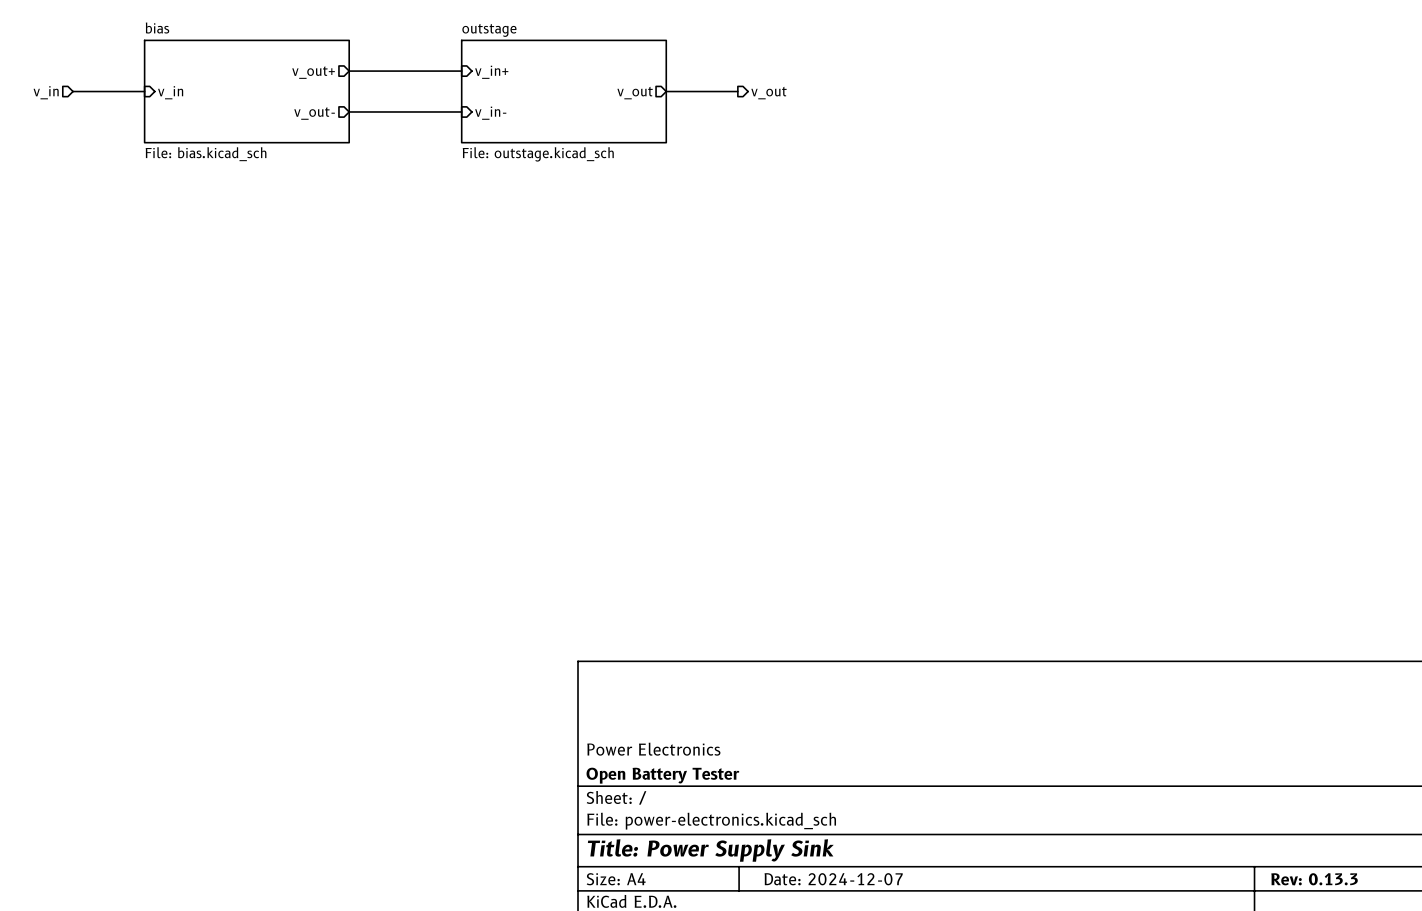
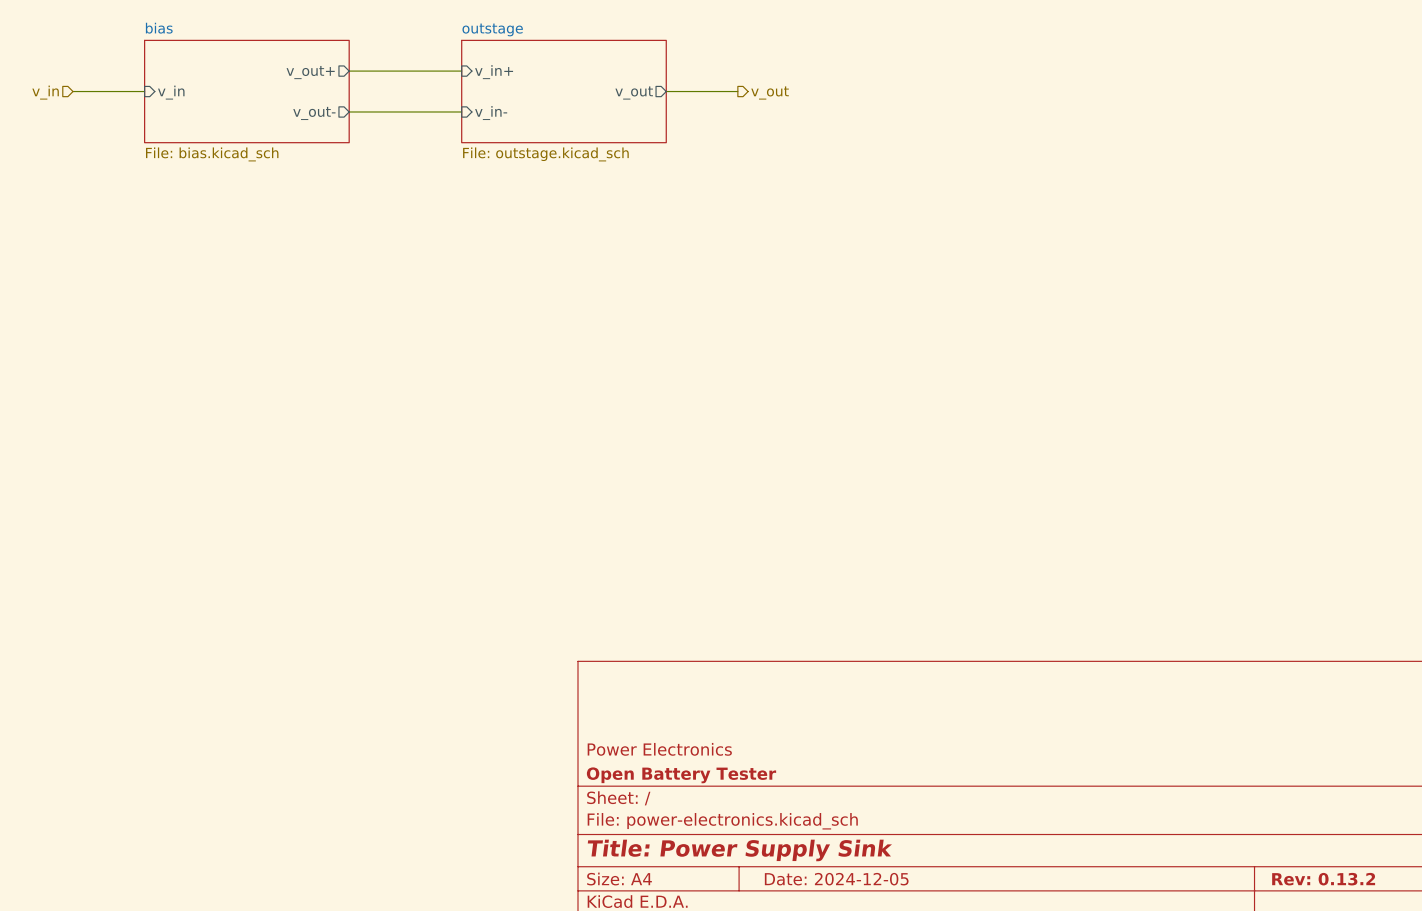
title block: Date: 2024-12-07 (833, 879) -> Date: 2024-12-05 (836, 879)
title block: Rev: 0.13.3 (1314, 879) -> Rev: 0.13.2 (1323, 879)

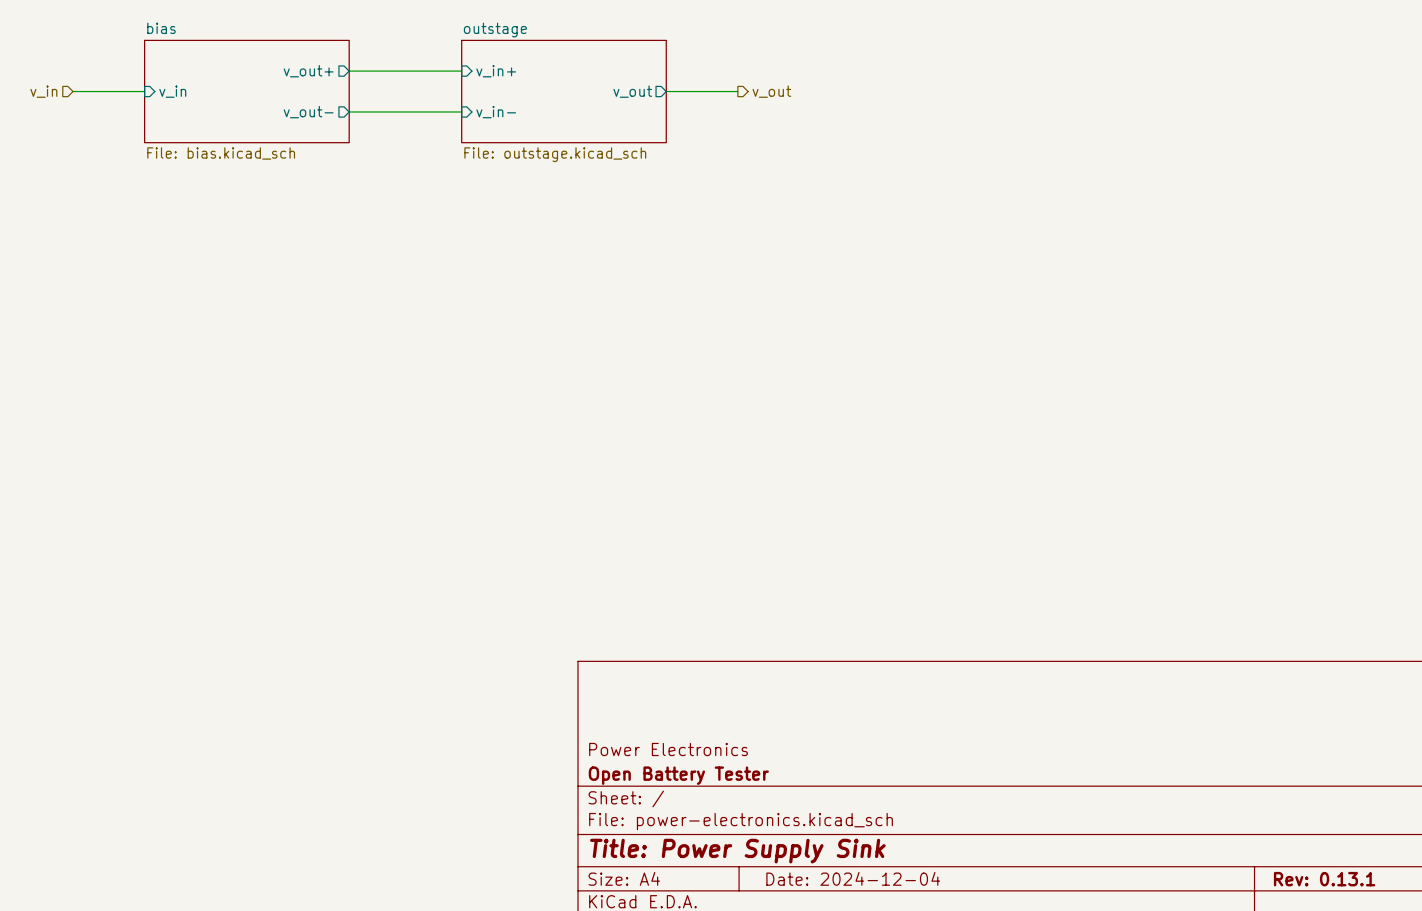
title block: Date: 2024-12-05 (836, 879) -> Date: 2024-12-04 (853, 878)
title block: Rev: 0.13.2 (1323, 879) -> Rev: 0.13.1 (1324, 879)

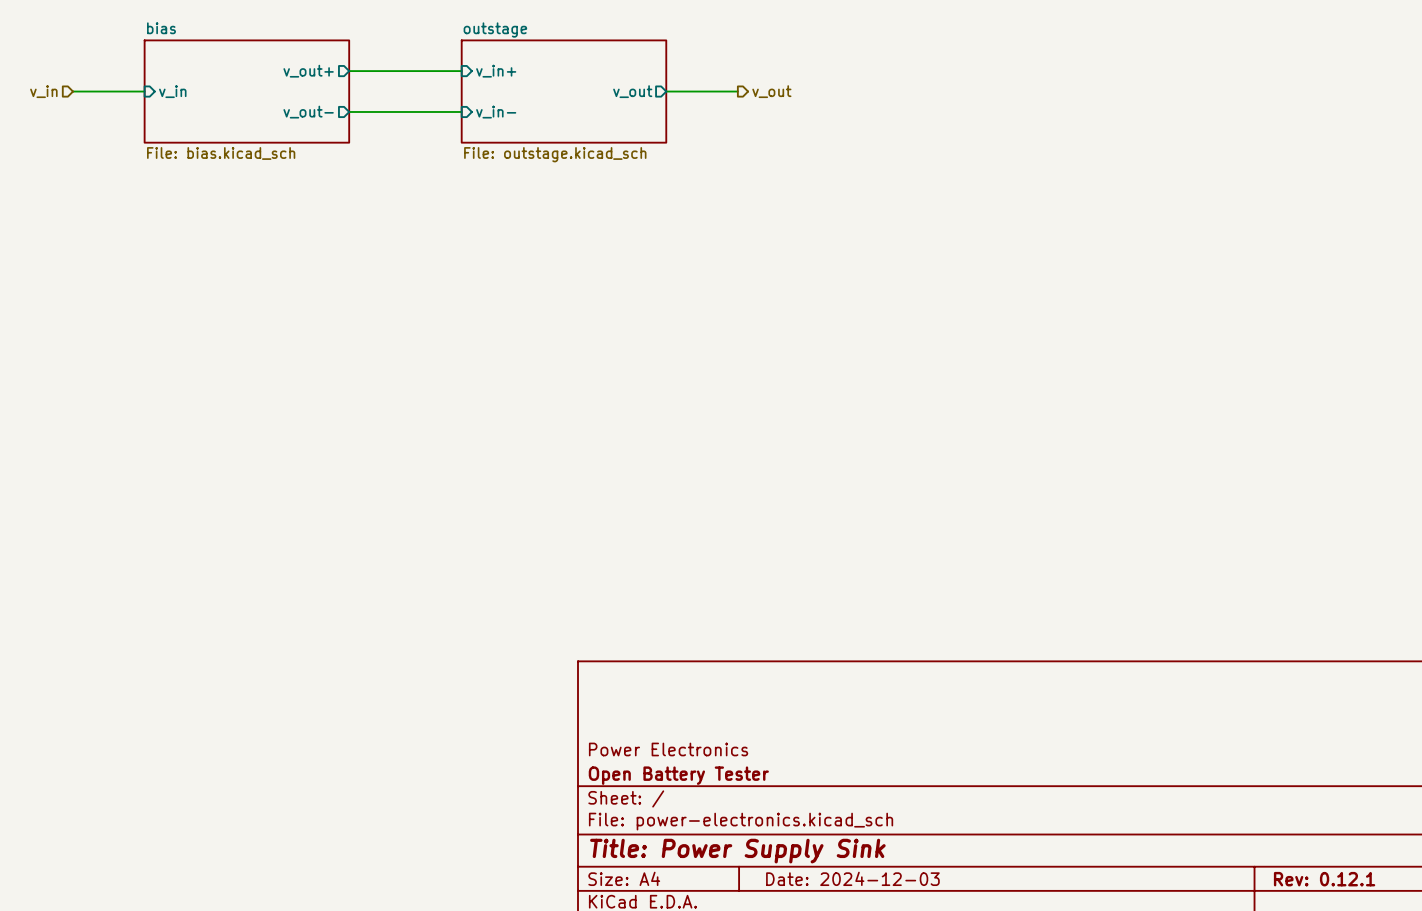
title block: Date: 2024-12-04 (853, 878) -> Date: 2024-12-03 (852, 878)
title block: Rev: 0.13.1 (1324, 879) -> Rev: 0.12.1 (1324, 879)

